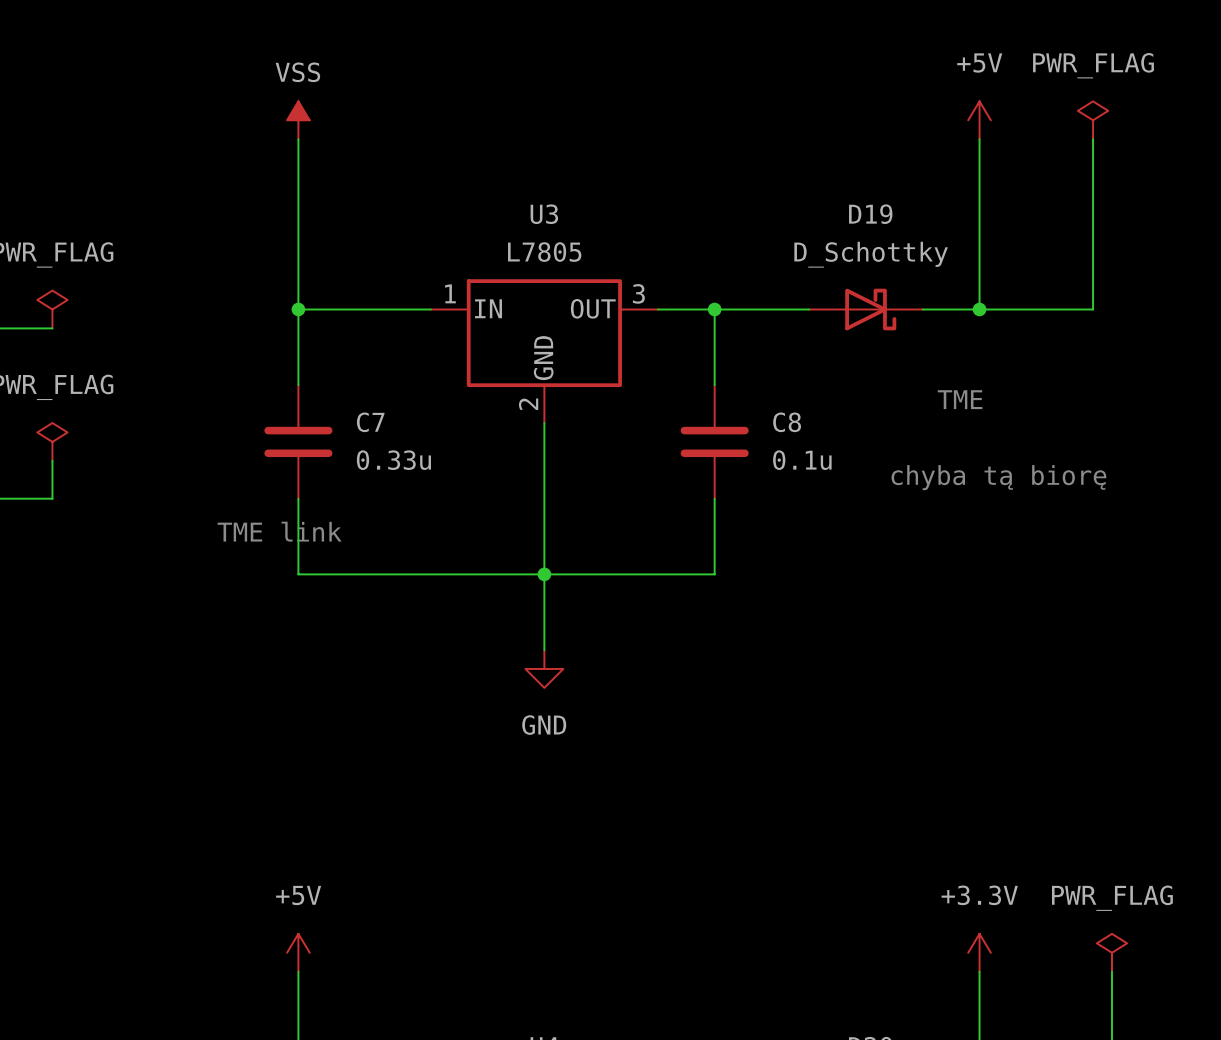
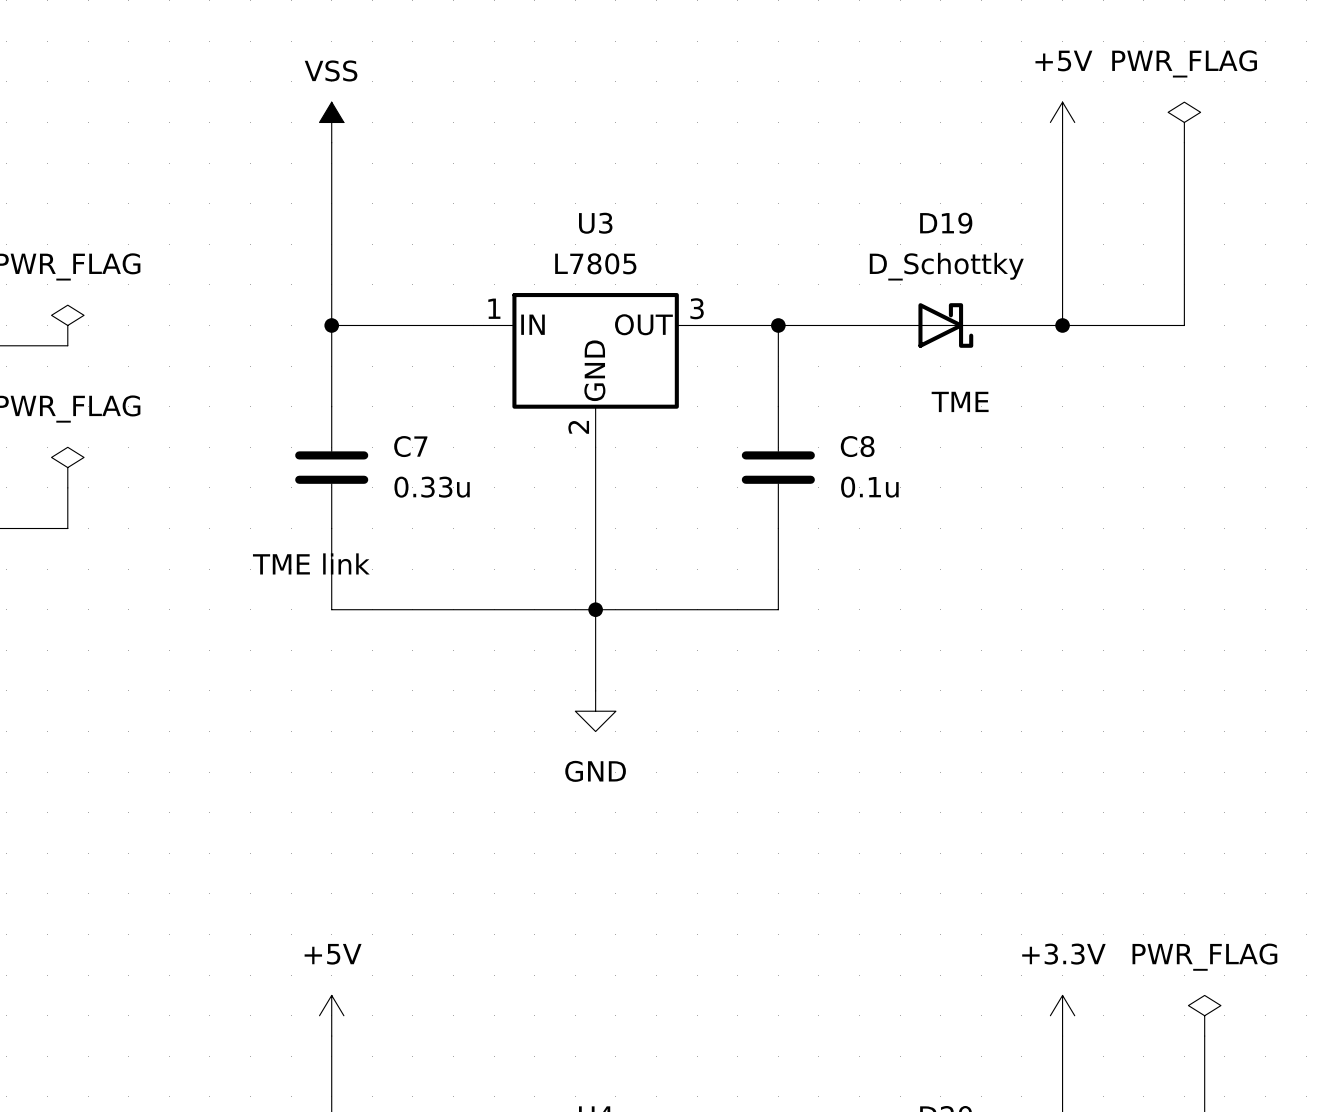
text position: TME (960, 399) -> TME (960, 401)
text: chyba tą biorę (998, 477) -> none

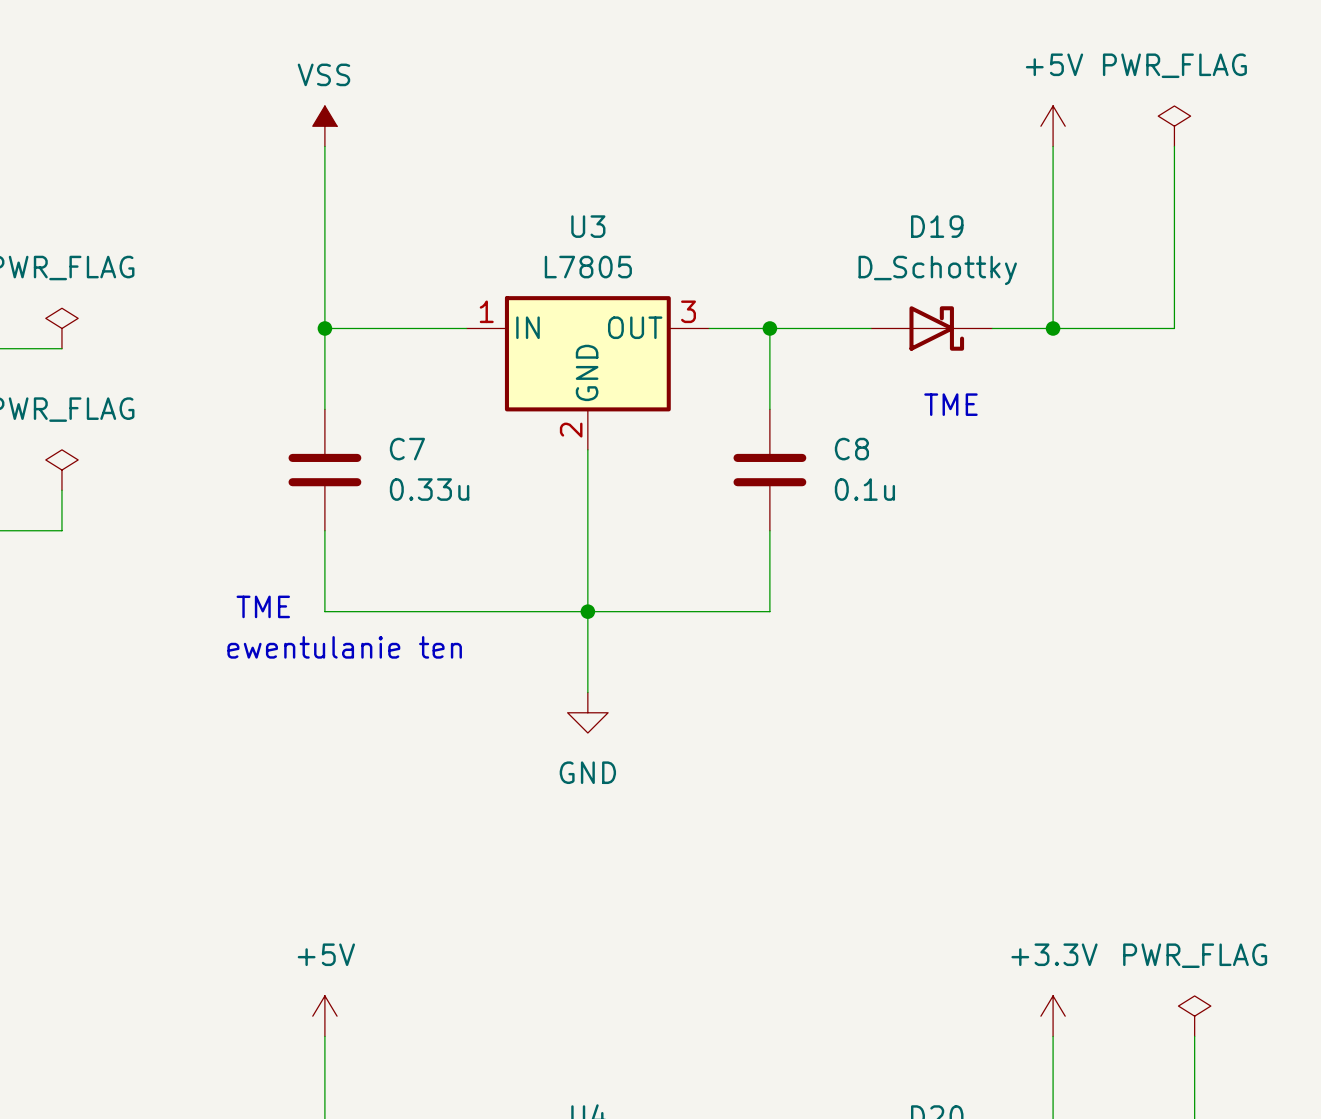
text: TME link (311, 563) -> none
text: none -> TME (263, 606)
text: none -> ewentulanie ten (344, 647)

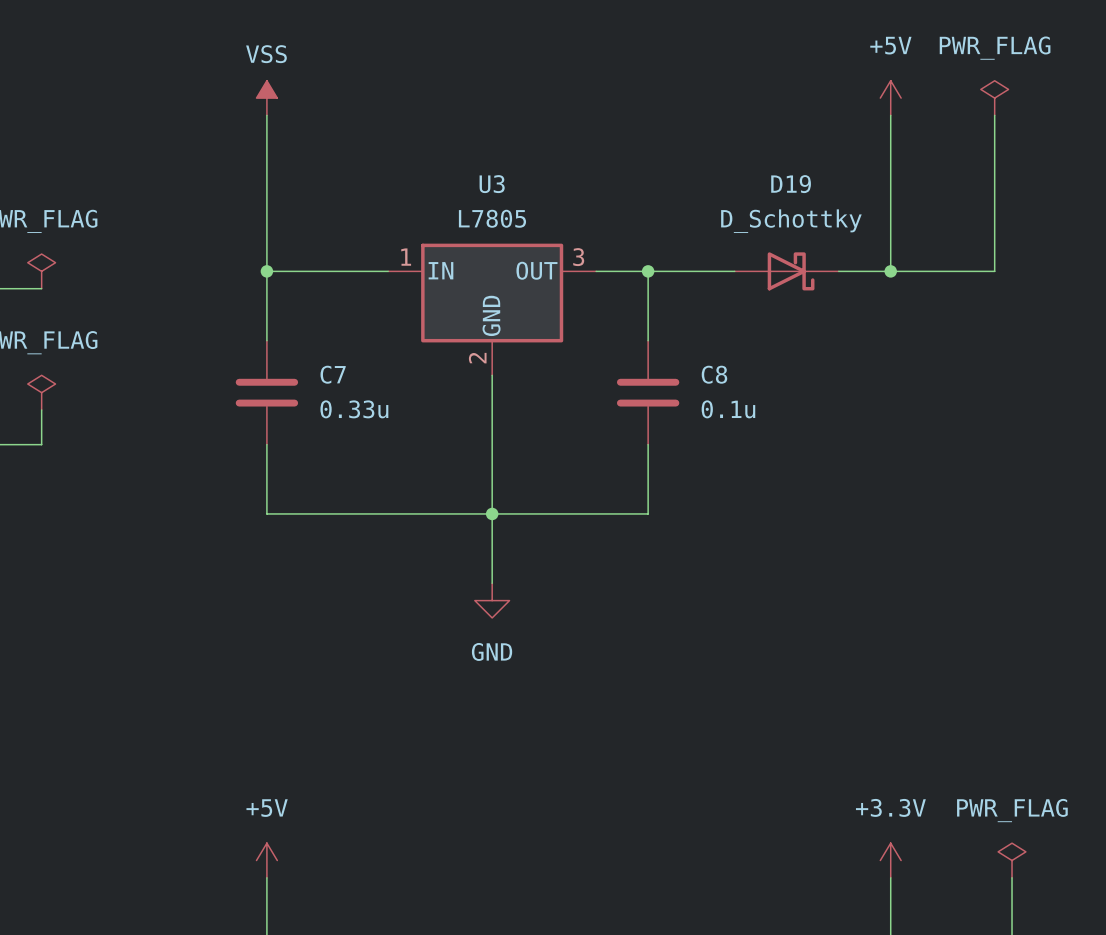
text: TME (950, 404) -> none
text: TME (263, 606) -> none
text: ewentulanie ten (344, 647) -> none

